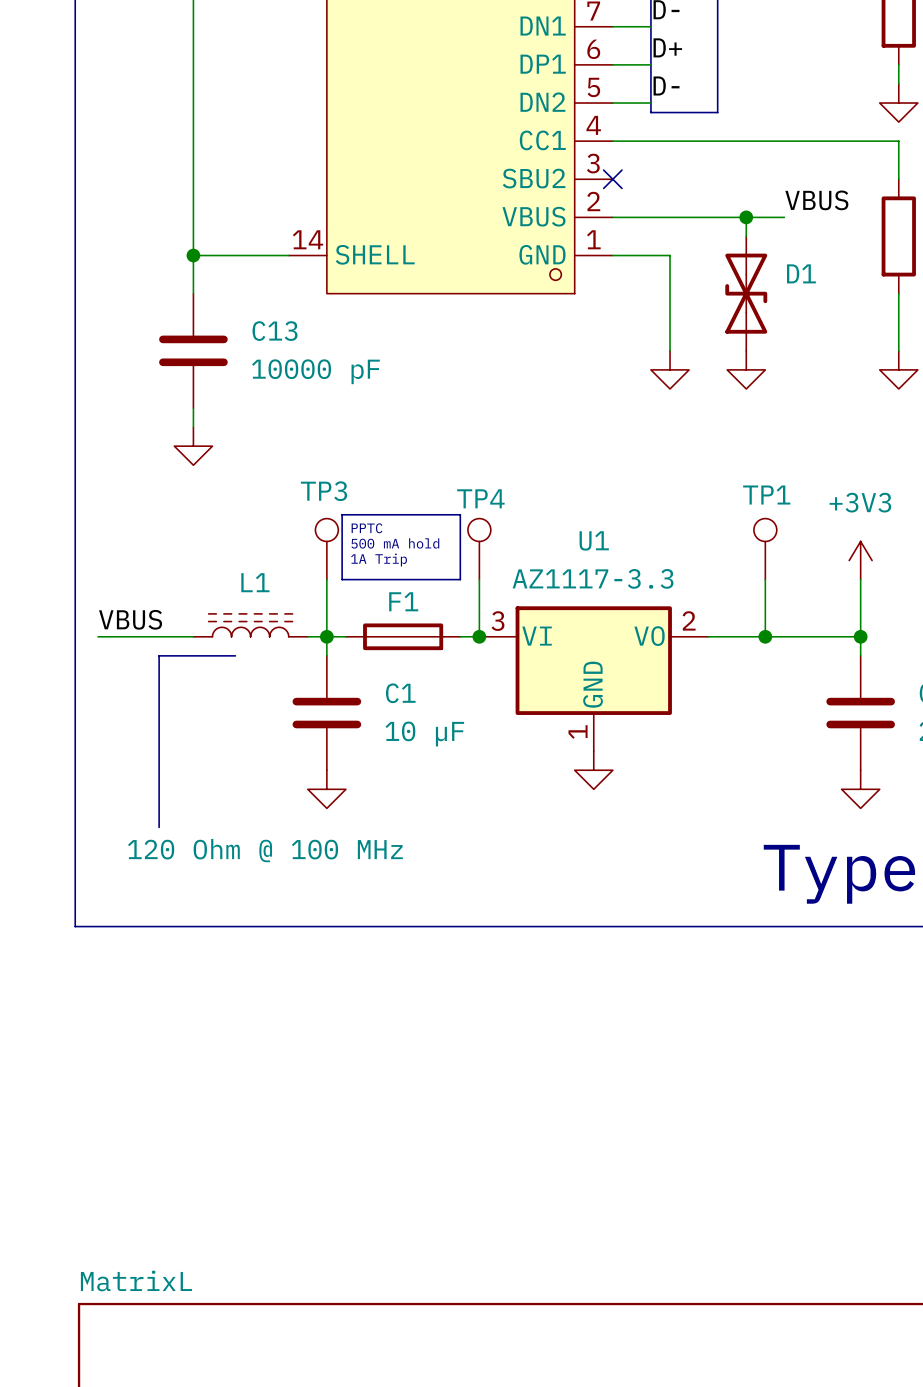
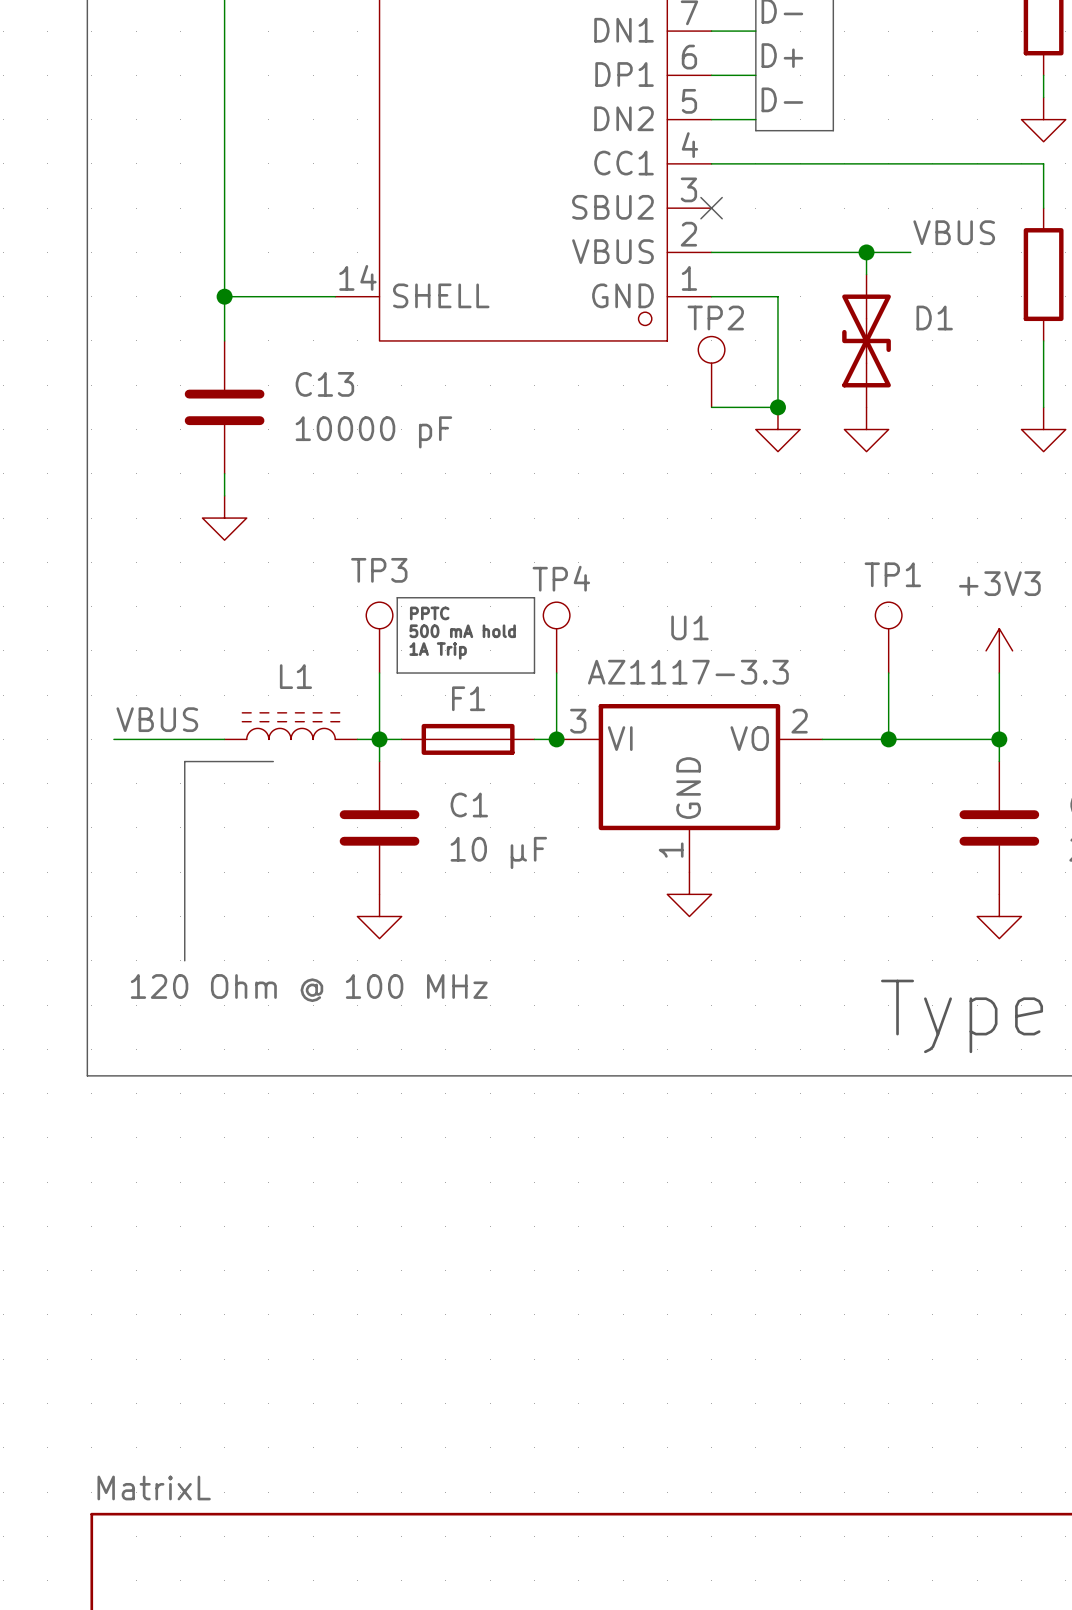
TP2: none -> (711, 371)
wire: none -> (711, 407) (777, 407)
junction: none -> (777, 407)

